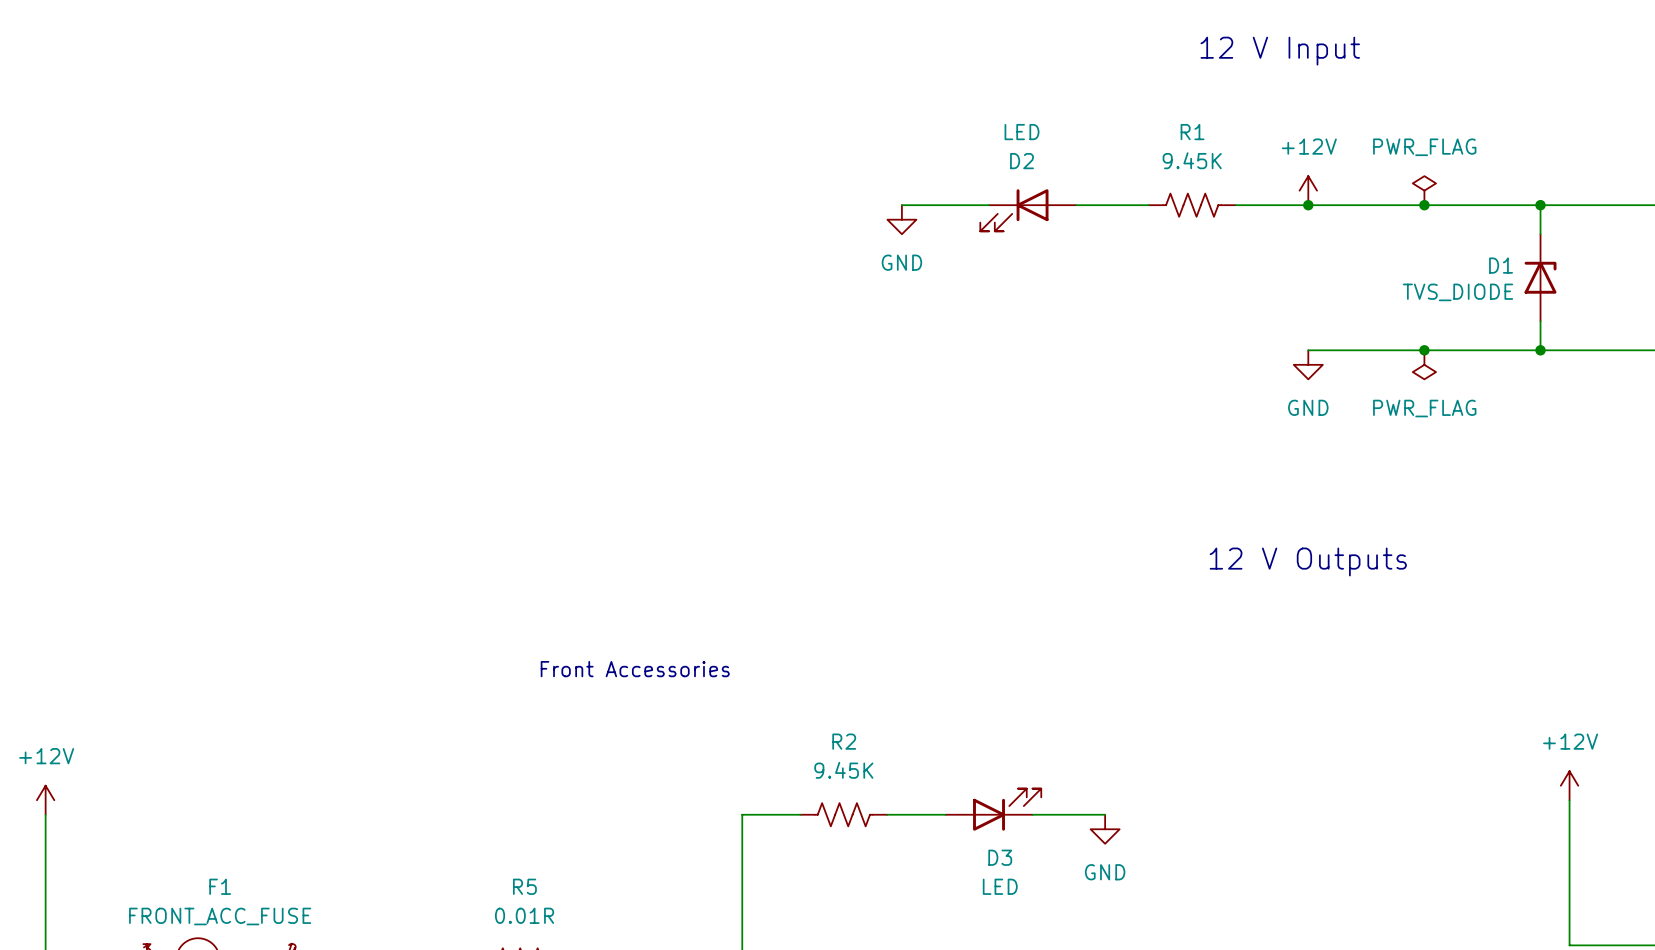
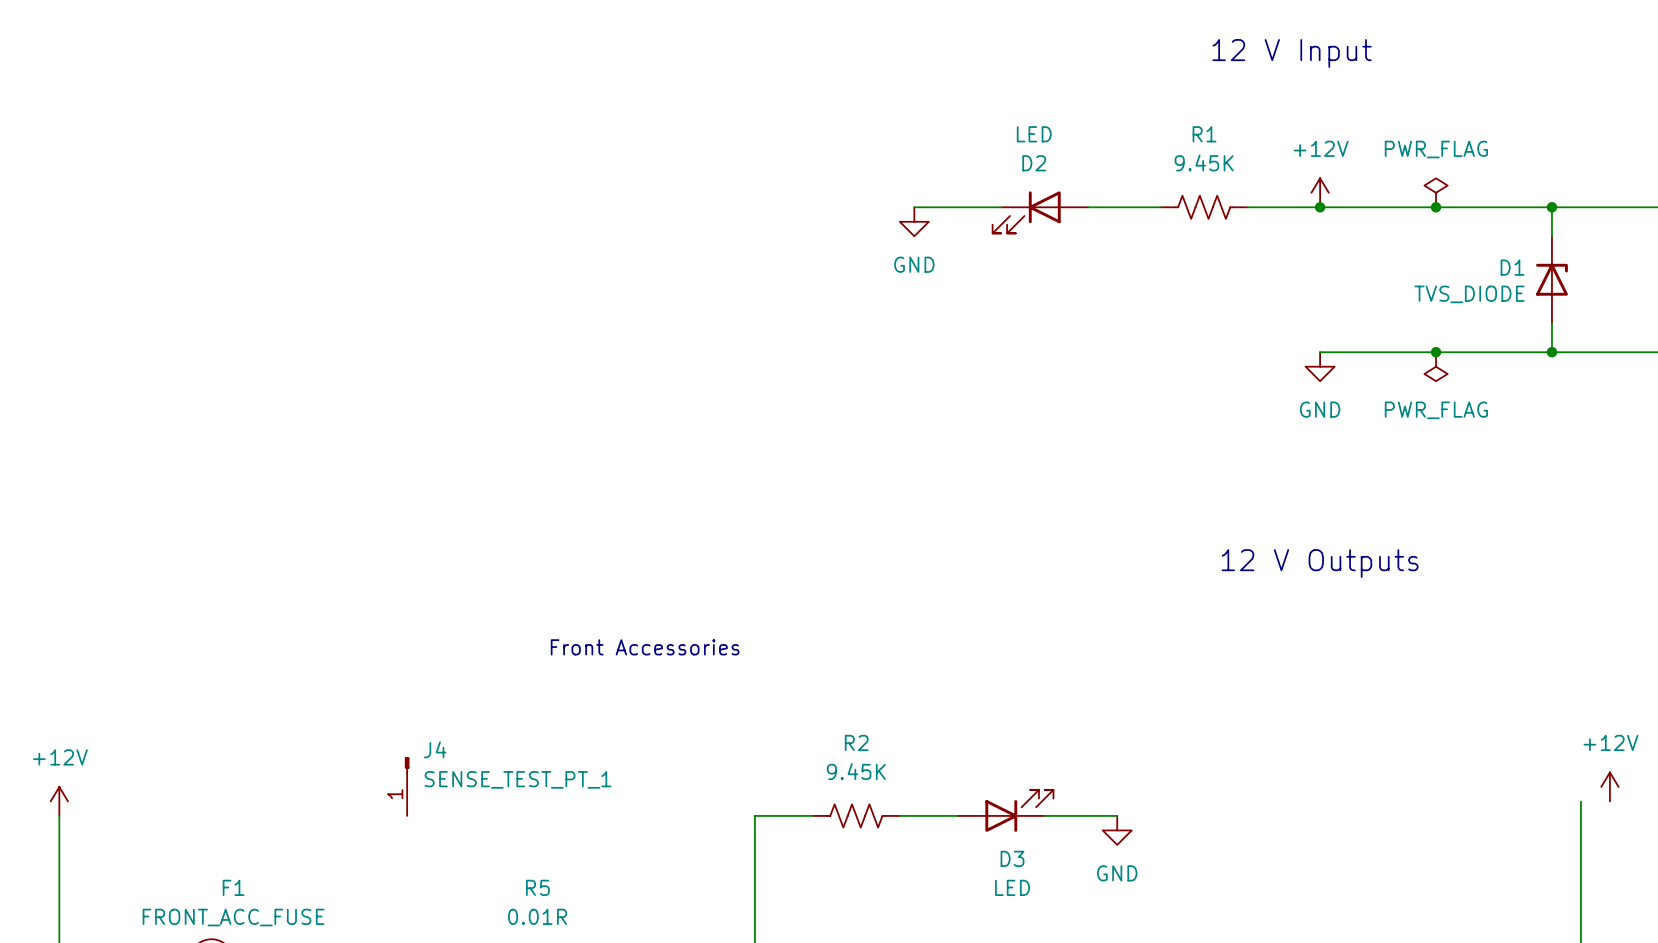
text position: Front Accessories (635, 669) -> Front Accessories (645, 647)
J4: none -> SENSE_TEST_PT_1 (407, 786)
power symbol position: +12V (1569, 785) -> +12V (1609, 786)

